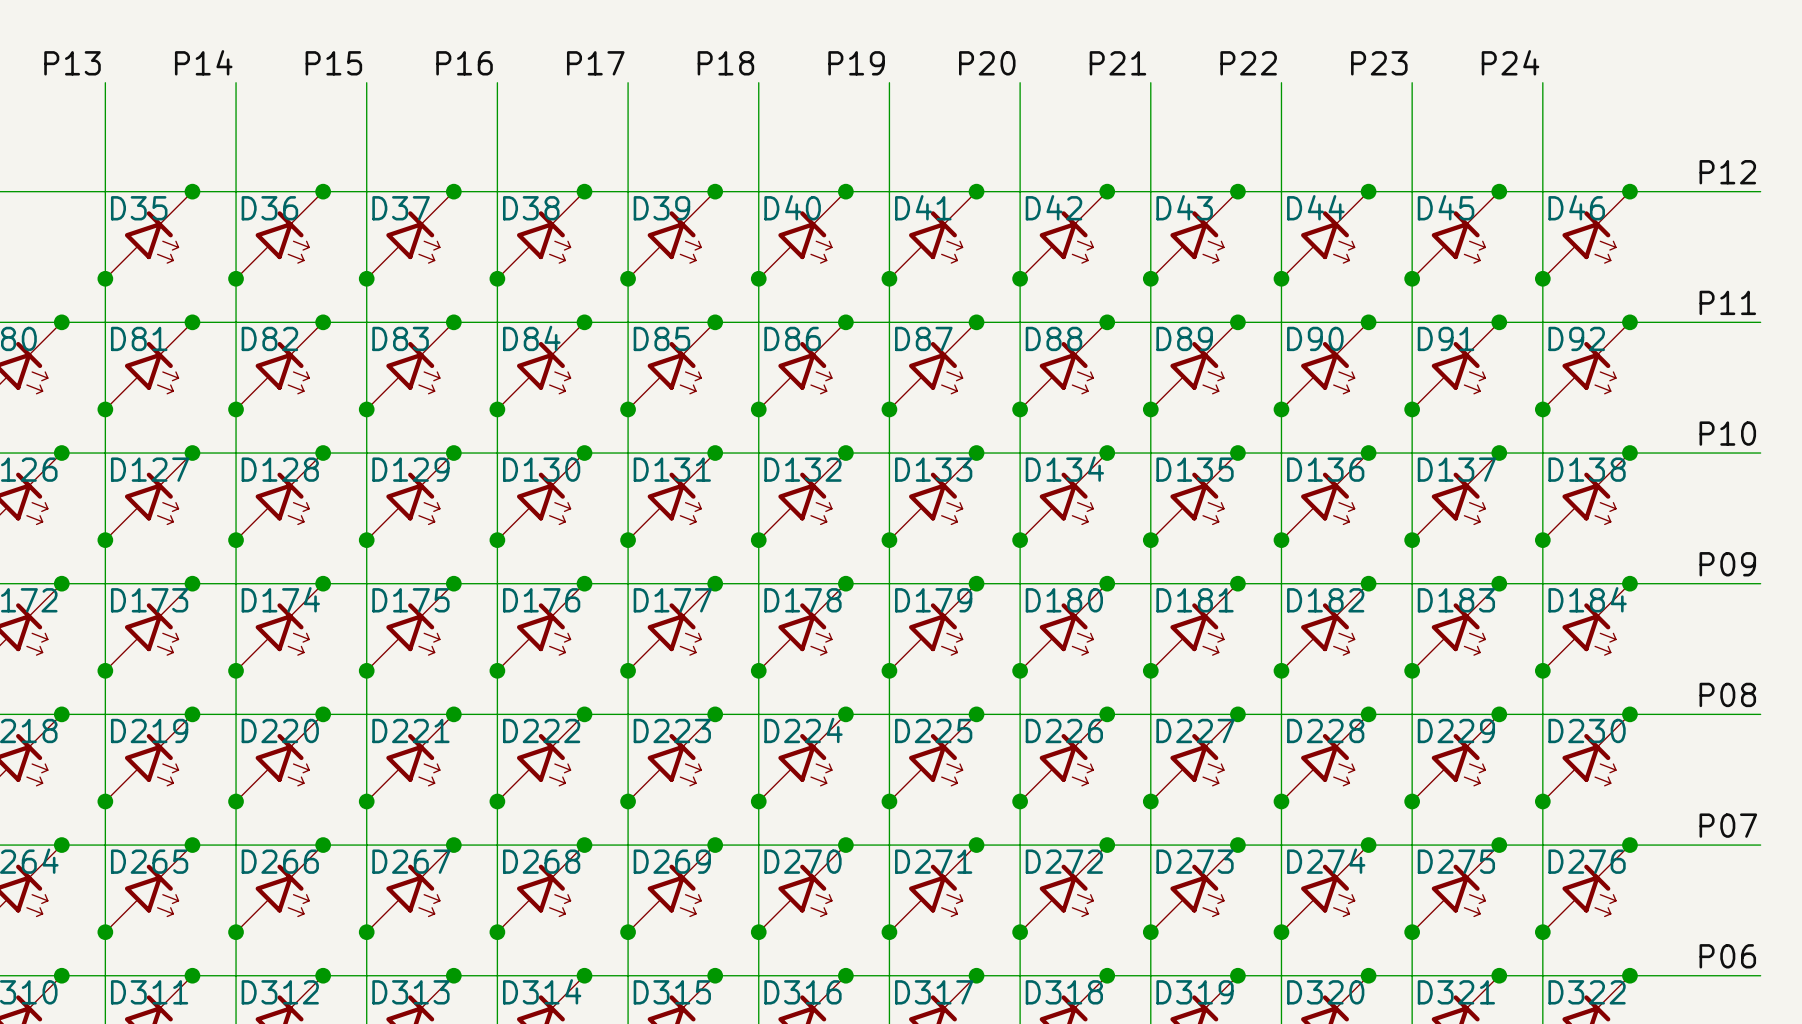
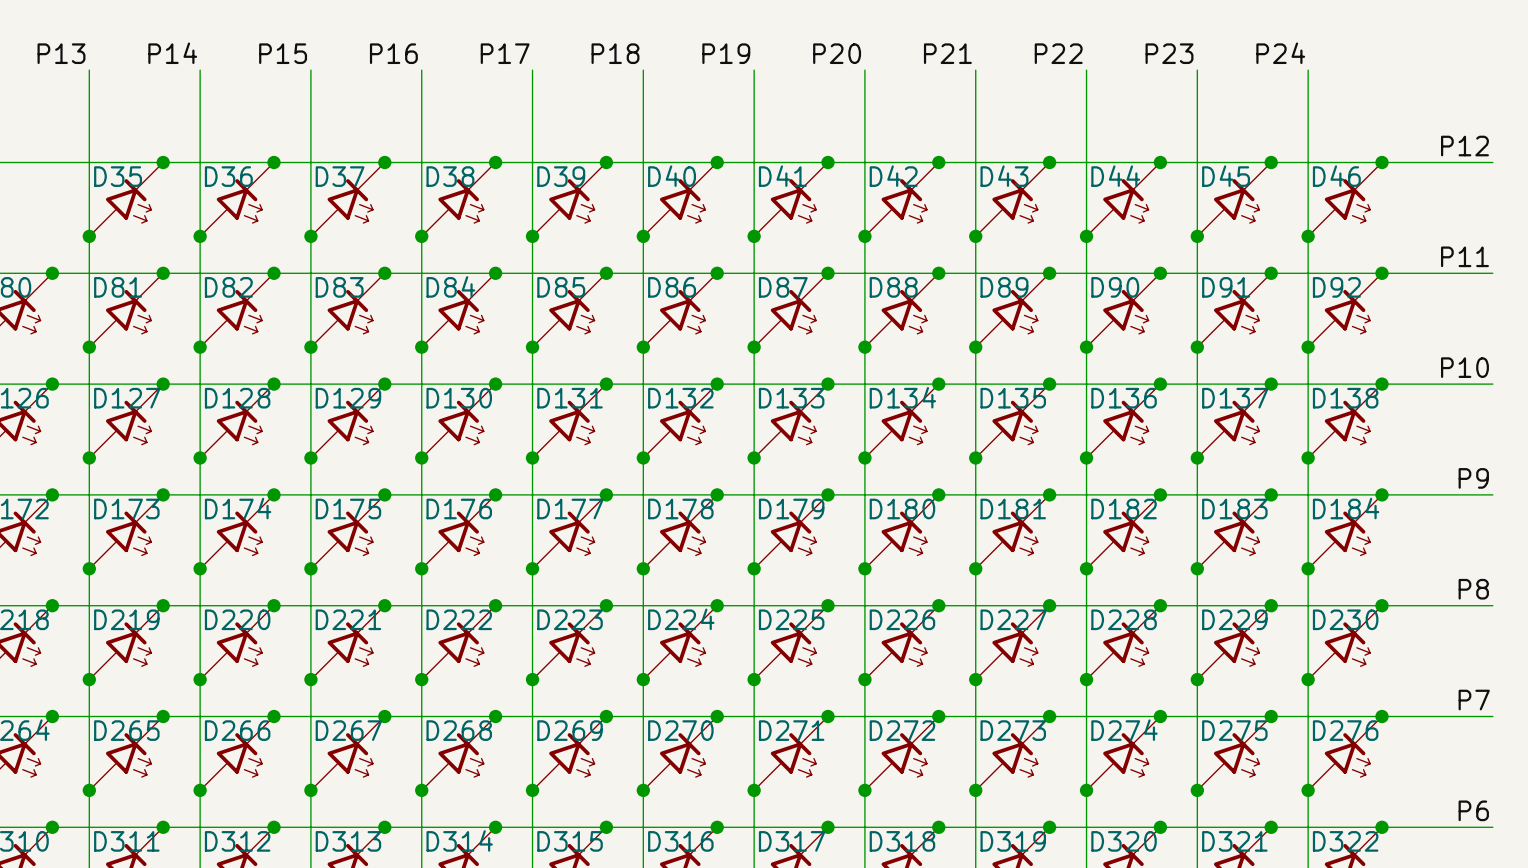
label: P09 (1727, 564) -> P9 (1473, 478)
label: P08 (1727, 694) -> P8 (1473, 589)
label: P07 (1728, 825) -> P7 (1474, 700)
label: P06 (1727, 956) -> P6 (1473, 810)

